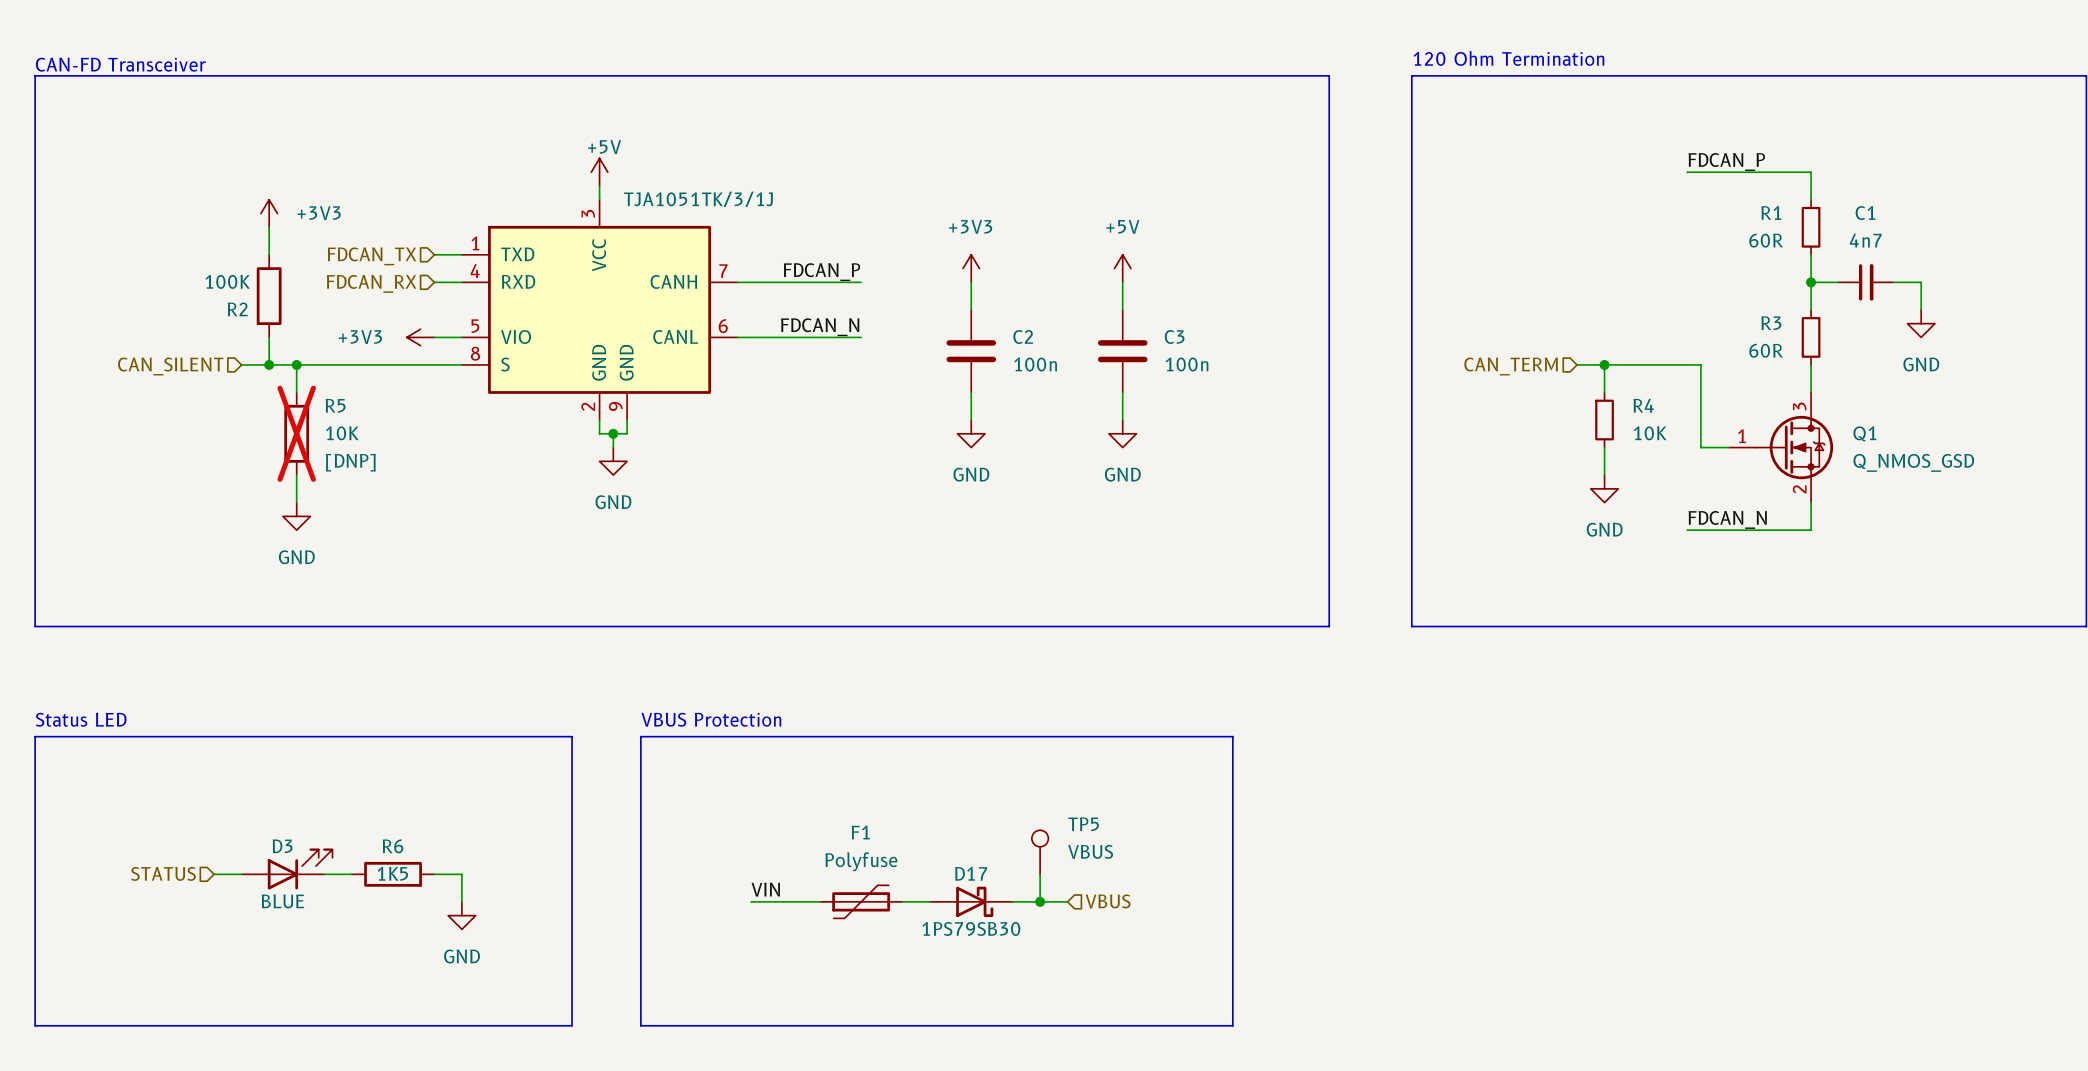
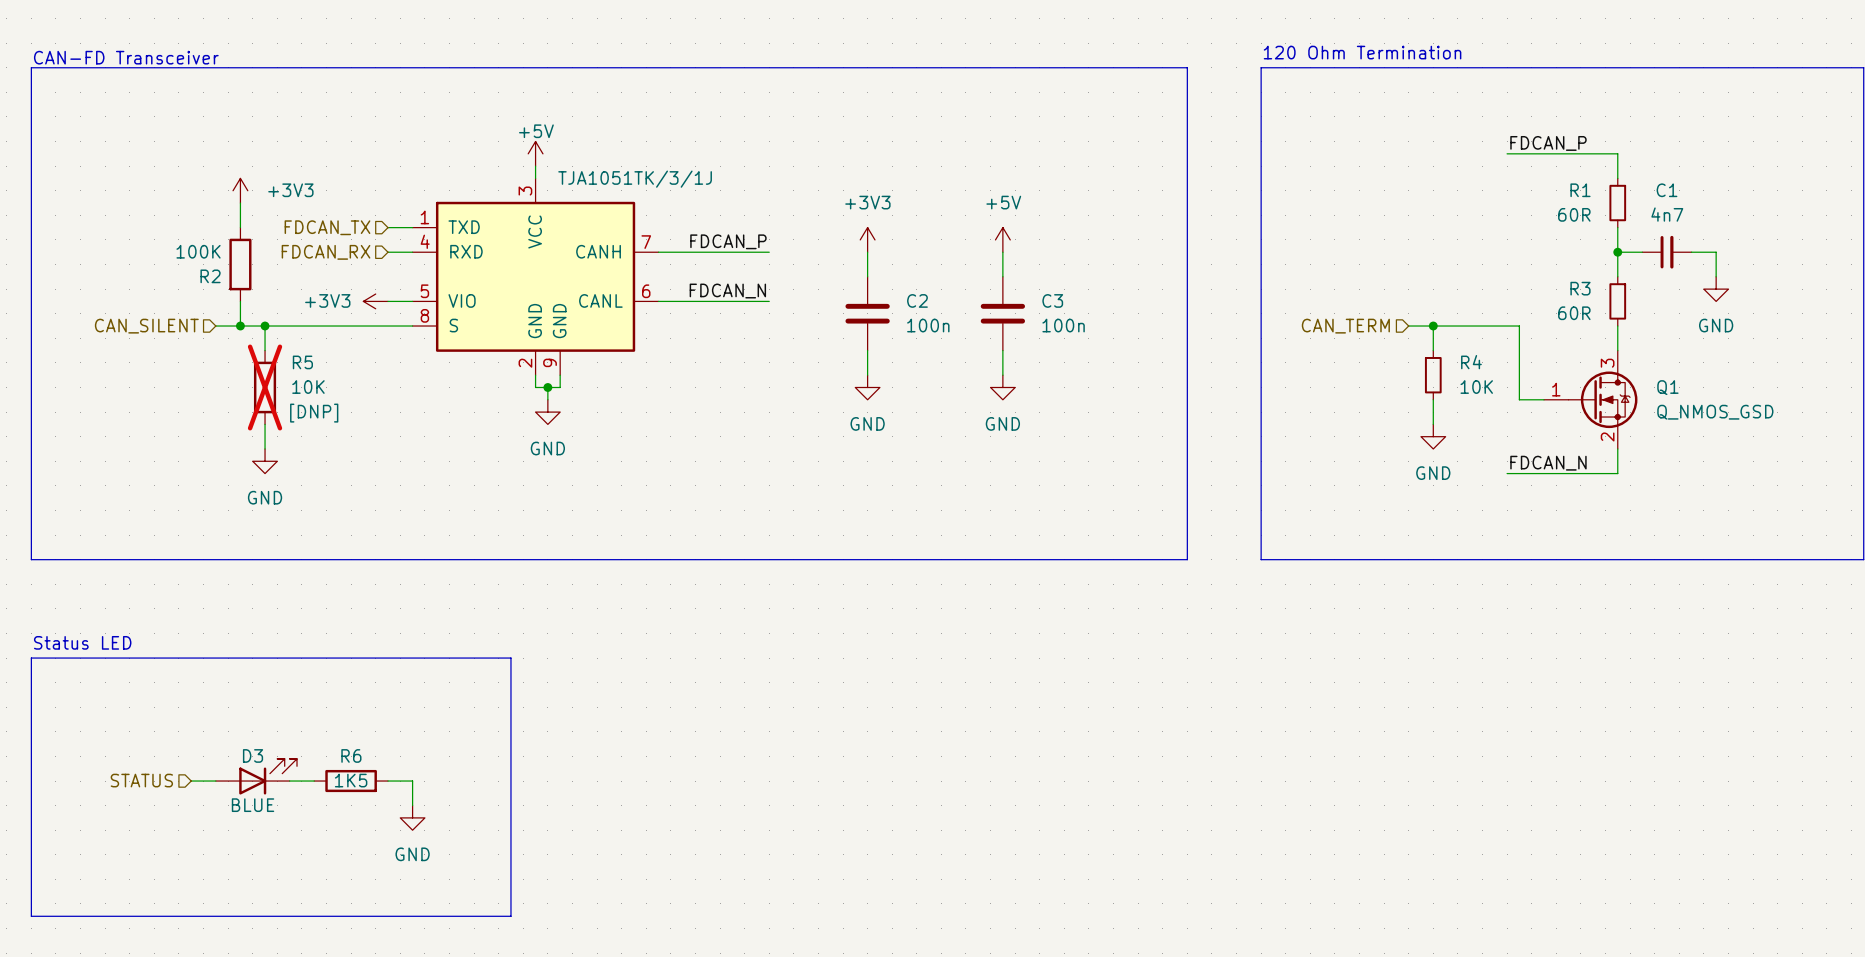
text: VBUS Protection (711, 719) -> none
line: (640, 736) (1232, 736) (1232, 1025) (640, 1025) (640, 736) -> none
TP5: VBUS (1040, 852) -> none
wire: (1040, 874) (1040, 901) -> none
label: VIN (765, 889) -> none
wire: (751, 901) (819, 901) -> none
F1: Polyfuse (861, 901) -> none
wire: (902, 901) (929, 901) -> none
D17: 1PS79SB30 (971, 901) -> none
wire: (1012, 901) (1067, 901) -> none
junction: (1040, 901) -> none
hierarchical label: VBUS (1108, 901) -> none

